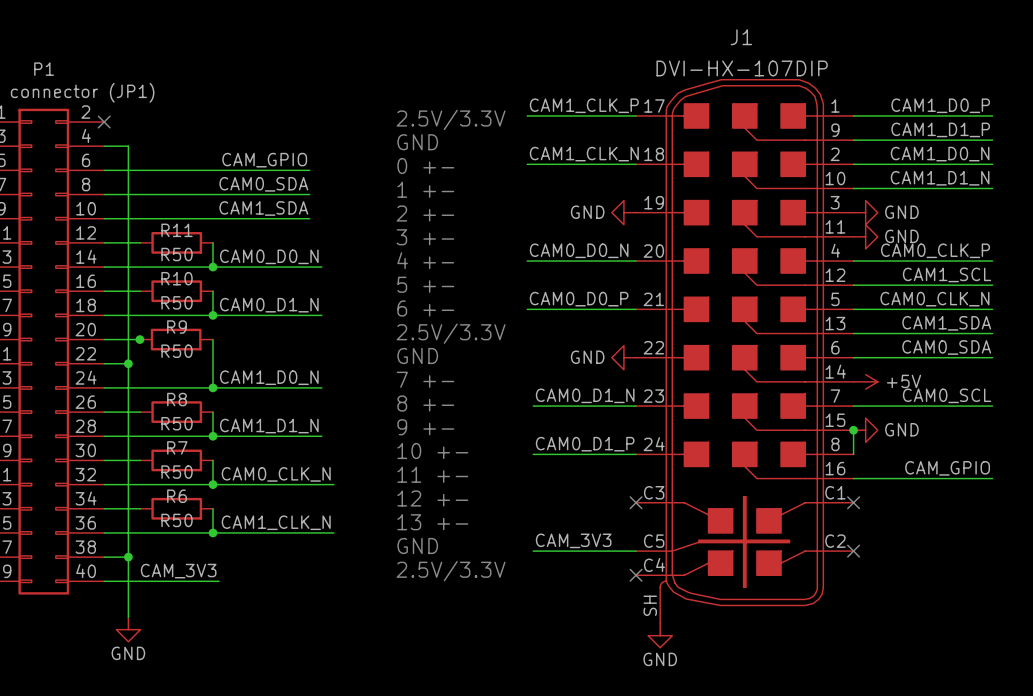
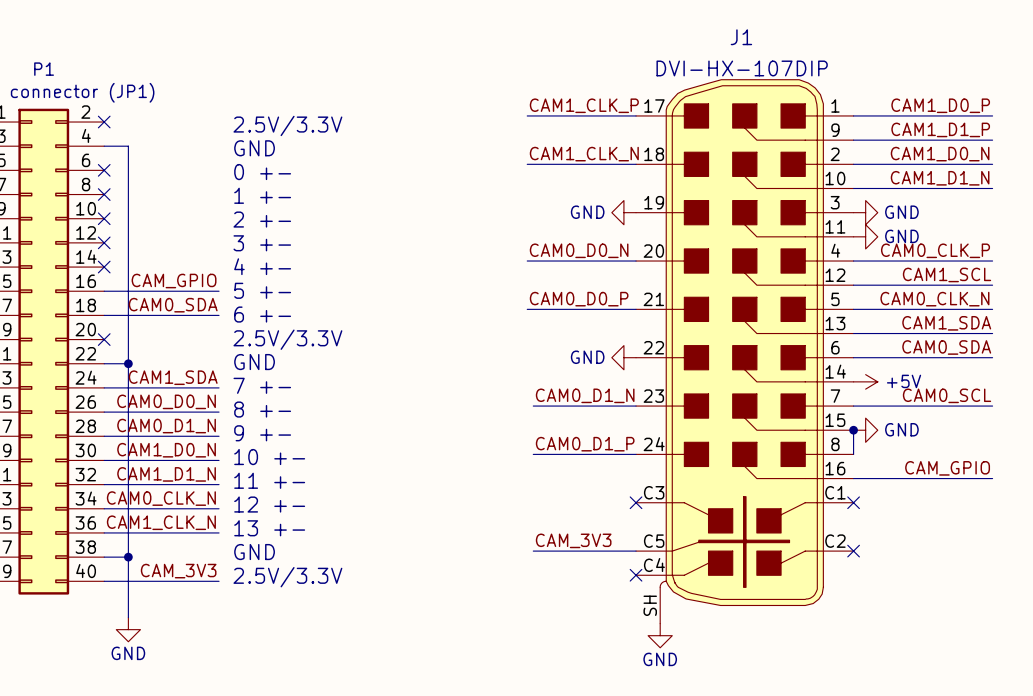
text: 2.5V/3.3V (451, 119) -> none
text: none -> 2.5V/3.3V (287, 125)
text: GND (417, 142) -> none
text: none -> GND (254, 148)
label position: CAM_GPIO (264, 160) -> CAM_GPIO (174, 281)
text position: 0 +- (425, 166) -> 0 +- (262, 172)
wire: (104, 170) (309, 170) -> none
no-connect mark: none -> (104, 170)
label position: CAM0_SDA (263, 184) -> CAM0_SDA (173, 305)
text position: 1 +- (425, 189) -> 1 +- (262, 195)
wire: (104, 194) (309, 194) -> none
no-connect mark: none -> (104, 194)
label position: CAM1_SDA (263, 208) -> CAM1_SDA (173, 377)
text position: 2 +- (425, 213) -> 2 +- (262, 219)
wire: (104, 218) (309, 218) -> none
no-connect mark: none -> (104, 218)
text position: 3 +- (425, 237) -> 3 +- (262, 243)
wire: (104, 242) (140, 242) -> none
no-connect mark: none -> (104, 242)
R11: R50 (176, 242) -> none
wire: (212, 242) (212, 267) -> none
label position: CAM0_D0_N (269, 256) -> CAM0_D0_N (166, 401)
text position: 4 +- (425, 260) -> 4 +- (262, 266)
wire: (104, 267) (321, 267) -> none
no-connect mark: none -> (104, 267)
junction: (212, 267) -> none
text position: 5 +- (425, 284) -> 5 +- (262, 290)
wire: none -> (140, 291) (219, 291)
R10: R50 (176, 291) -> none
wire: (212, 291) (212, 315) -> none
label position: CAM0_D1_N (269, 305) -> CAM0_D1_N (166, 426)
text position: 6 +- (425, 308) -> 6 +- (262, 314)
junction: (212, 315) -> none
wire: (219, 315) (321, 315) -> none
text: 2.5V/3.3V (451, 333) -> none
wire: (104, 339) (140, 339) -> none
no-connect mark: none -> (104, 339)
junction: (139, 339) -> none
R9: R50 (176, 339) -> none
wire: (212, 339) (212, 387) -> none
text: none -> 2.5V/3.3V (287, 339)
text: GND (417, 356) -> none
text: none -> GND (254, 362)
label position: CAM1_D0_N (269, 377) -> CAM1_D0_N (166, 450)
text position: 7 +- (425, 379) -> 7 +- (262, 385)
junction: (212, 387) -> none
wire: (219, 387) (321, 387) -> none
text position: 8 +- (425, 403) -> 8 +- (262, 409)
wire: none -> (140, 412) (219, 412)
R8: R50 (176, 412) -> none
wire: (212, 412) (212, 436) -> none
label position: CAM1_D1_N (269, 426) -> CAM1_D1_N (166, 474)
text position: 9 +- (425, 427) -> 9 +- (262, 433)
junction: (212, 436) -> none
wire: (219, 436) (321, 436) -> none
text position: 10 +- (432, 450) -> 10 +- (269, 457)
wire: none -> (140, 460) (219, 460)
R7: R50 (176, 460) -> none
wire: (212, 460) (212, 484) -> none
label position: CAM0_CLK_N (276, 474) -> CAM0_CLK_N (161, 498)
text position: 11 +- (432, 474) -> 11 +- (269, 480)
junction: (212, 484) -> none
wire: (219, 484) (333, 484) -> none
text position: 12 +- (432, 498) -> 12 +- (269, 504)
wire: none -> (140, 508) (219, 508)
R6: R50 (176, 508) -> none
wire: (212, 508) (212, 532) -> none
label position: CAM1_CLK_N (276, 522) -> CAM1_CLK_N (161, 522)
text position: 13 +- (432, 522) -> 13 +- (269, 528)
junction: (212, 532) -> none
wire: (219, 532) (333, 532) -> none
text: GND (417, 545) -> none
text: none -> GND (254, 552)
text: 2.5V/3.3V (451, 571) -> none
text: none -> 2.5V/3.3V (287, 577)

